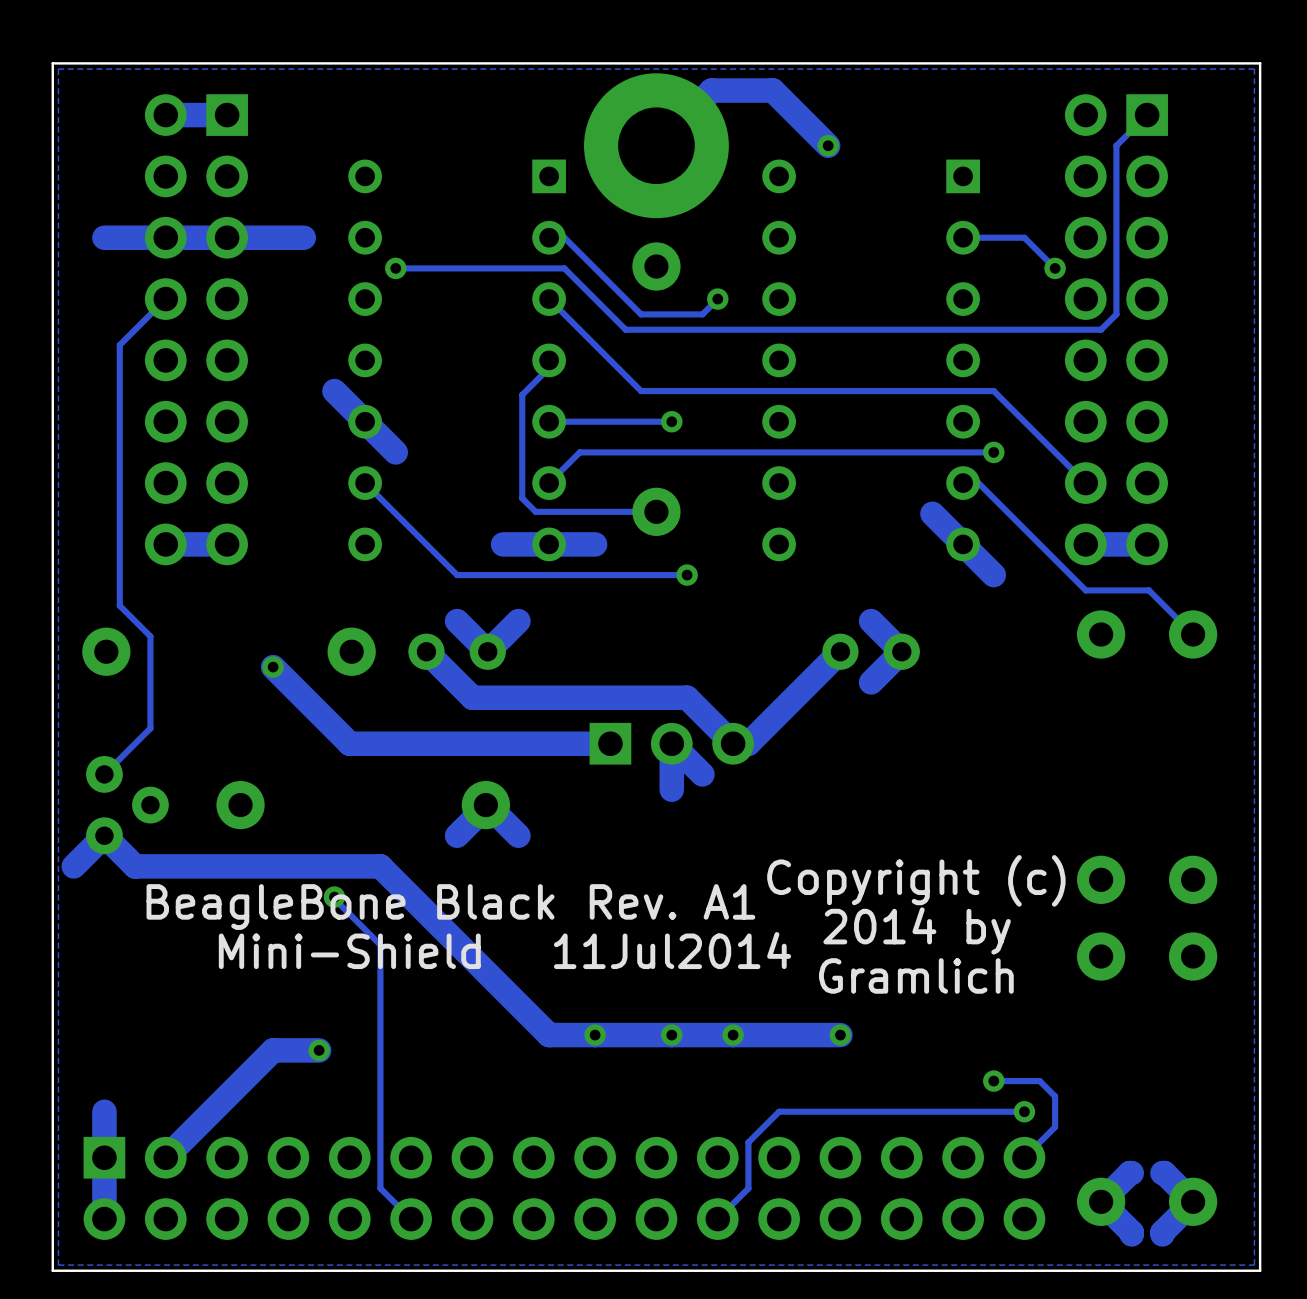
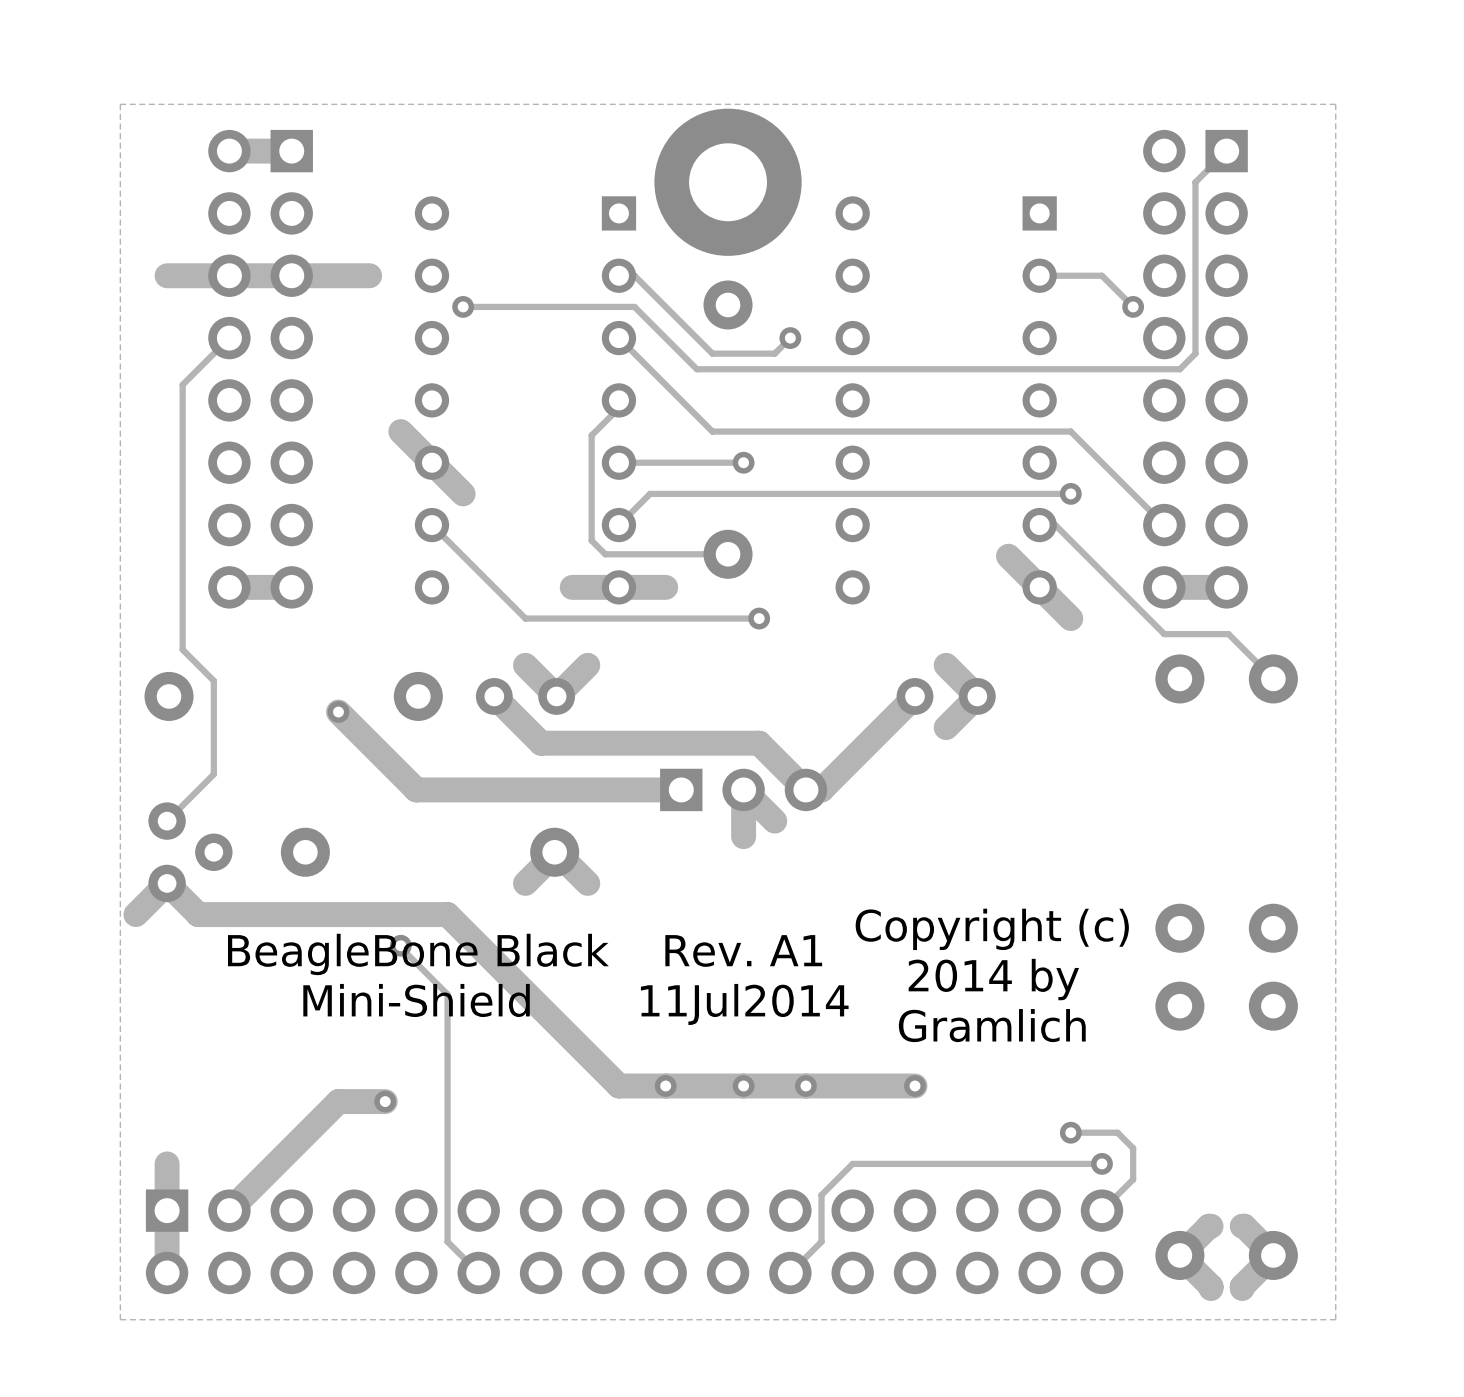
board edge: (1260, 63) (52, 63) (52, 1270) (1260, 1270) (1260, 63) -> none
track: (828, 145) (772, 90) (711, 90) (656, 145) -> none
via: (828, 145) -> none

